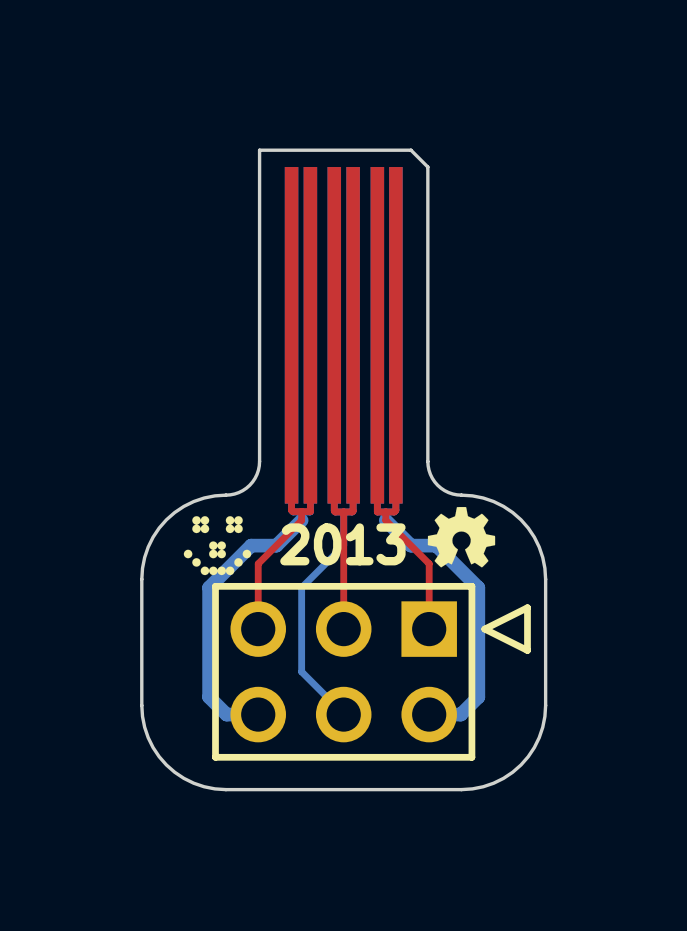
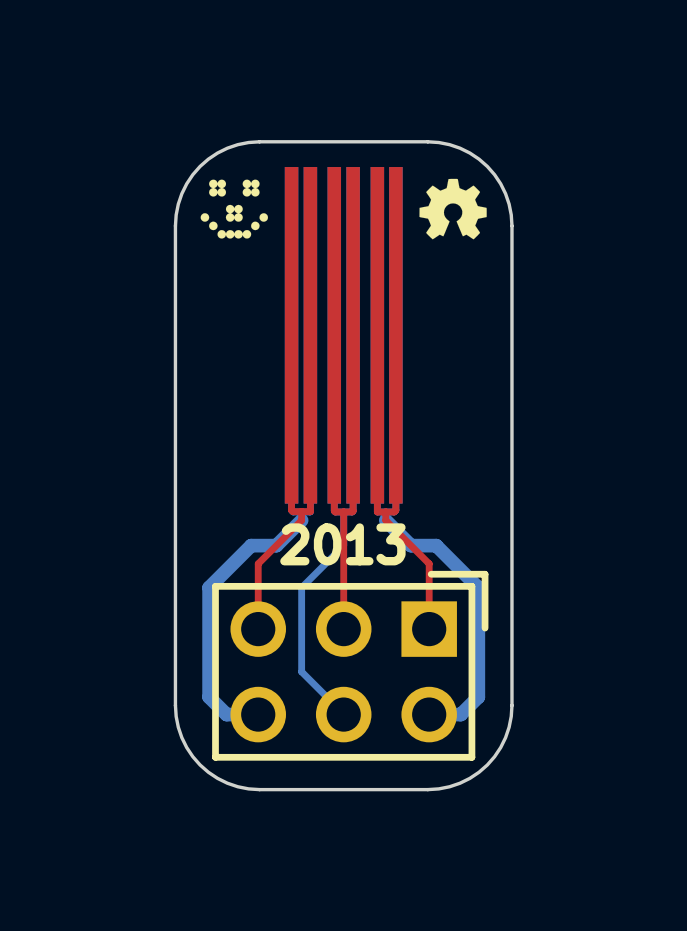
drawing position: (461, 537) -> (453, 209)
drawing position: (217, 545) -> (234, 209)
part footprint: [212, 582, 531, 761] -> [212, 570, 489, 761]
board edge: (259, 789) (225, 789) (204, 786) (174, 772) (153, 747) (144, 727) (141, 705) (142, 568) (153, 537) (166, 519) (183, 506) (204, 498) (238, 492) (249, 485) (258, 470) (259, 150) (411, 150) (427, 167) (428, 470) (434, 481) (444, 490) (457, 494) (483, 498) (512, 512) (528, 528) (542, 557) (545, 579) (545, 705) (542, 727) (534, 747) (512, 772) (493, 783) (472, 788) (427, 789) -> (259, 789) (227, 783) (200, 764) (181, 737) (175, 705) (176, 214) (186, 183) (208, 159) (237, 144) (259, 141) (427, 141) (449, 144) (469, 153) (487, 166) (500, 183) (509, 204) (511, 225) (511, 716) (500, 747) (479, 772) (449, 786) (427, 789)

